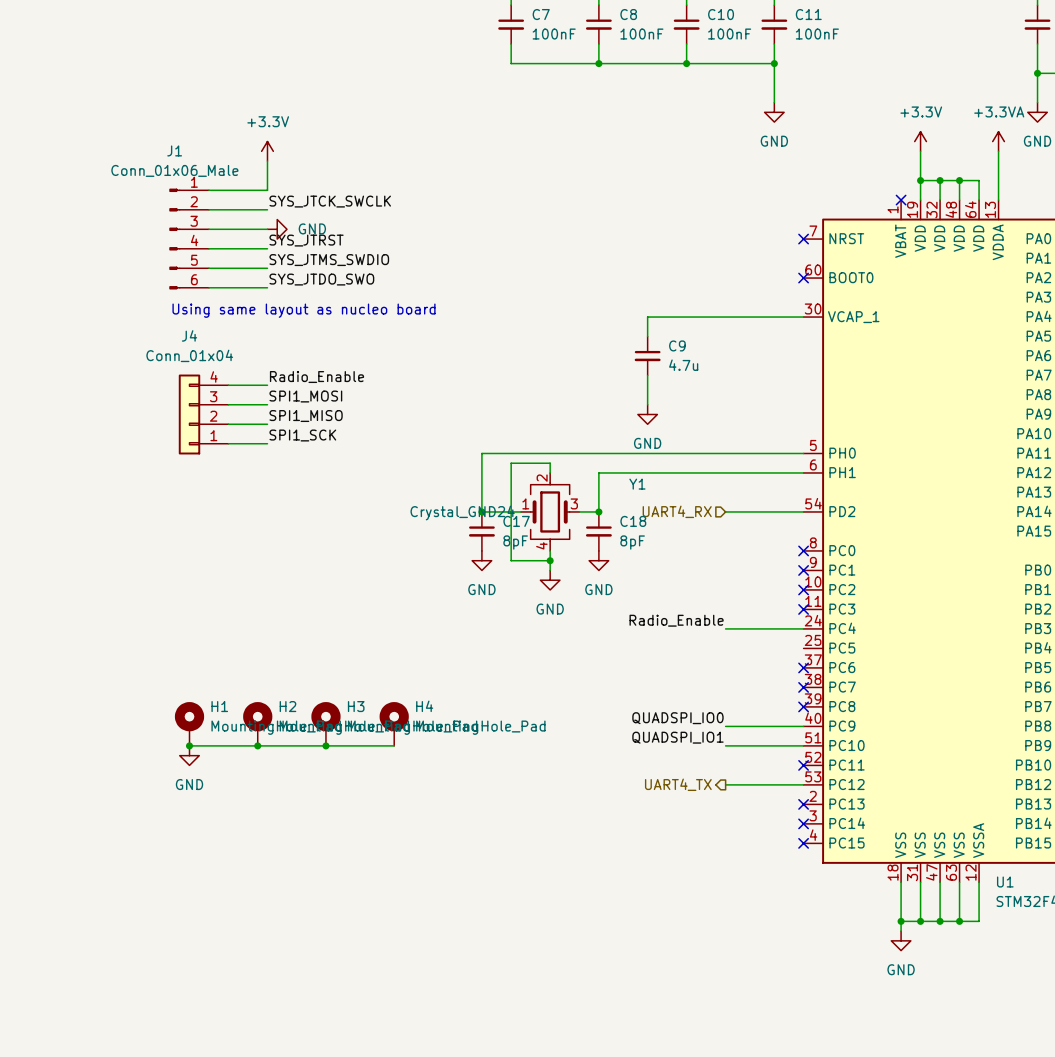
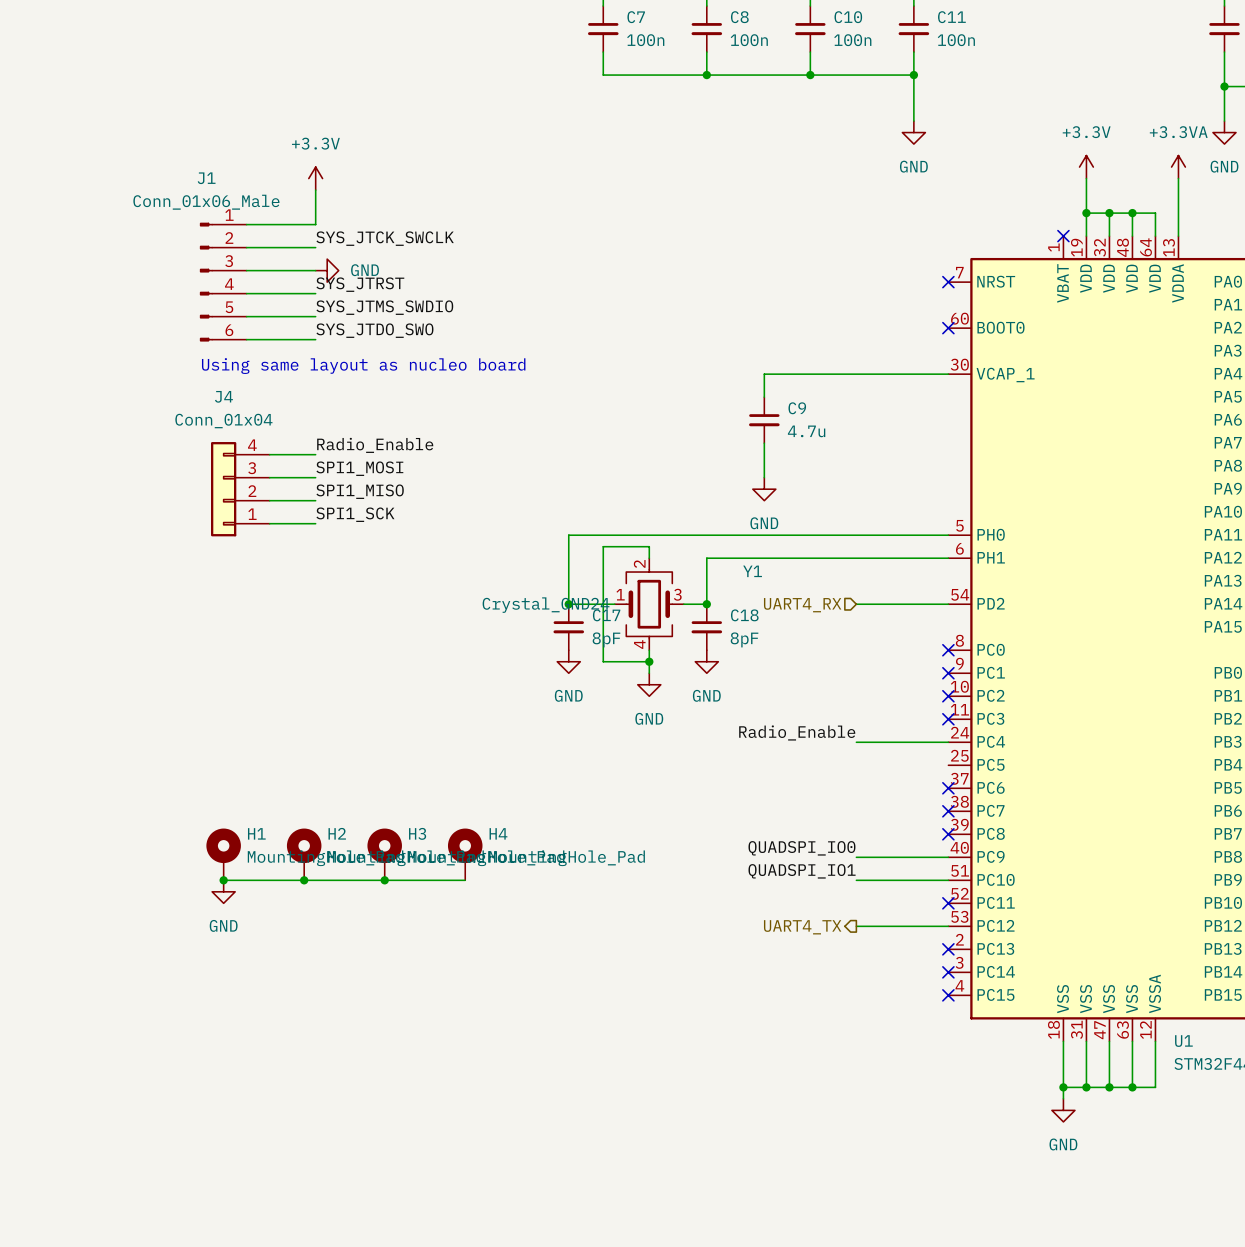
C7 value: 100nF (554, 34) -> 100n (645, 40)
C8 value: 100nF (641, 34) -> 100n (749, 40)
C10 value: 100nF (729, 34) -> 100n (852, 40)
C11 value: 100nF (817, 34) -> 100n (956, 40)

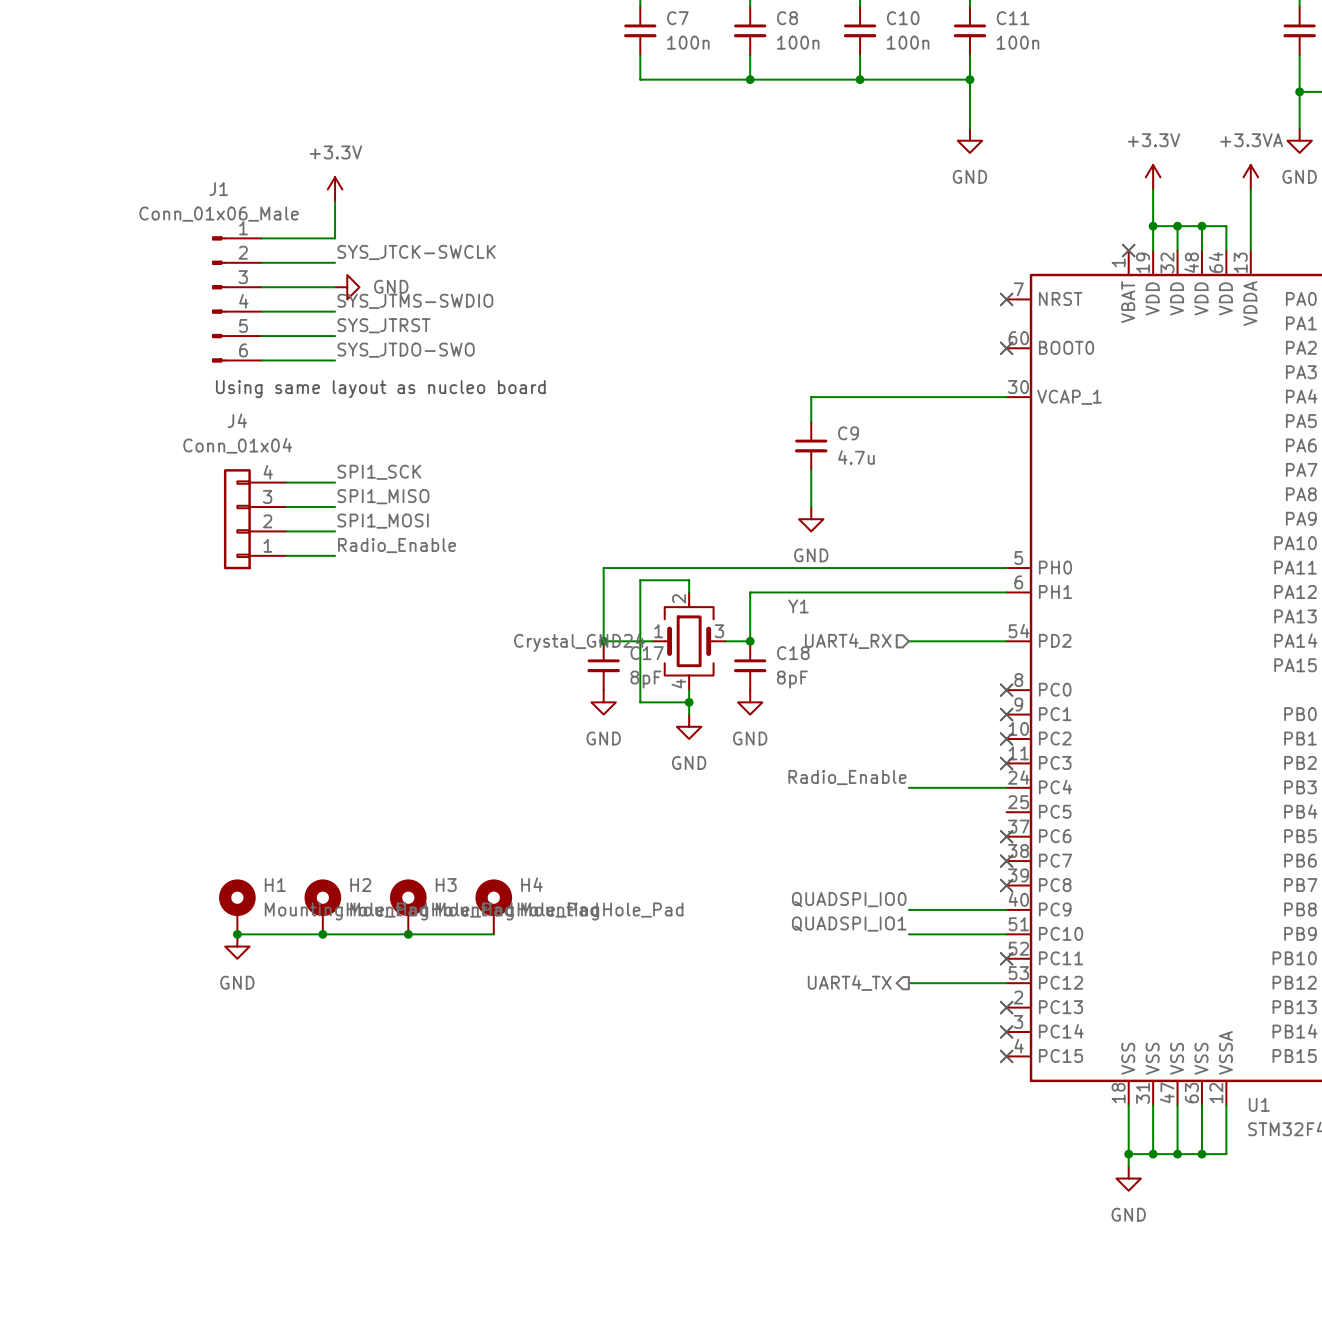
label: SYS_JTCK_SWCLK (385, 238) -> SYS_JTCK-SWCLK (416, 252)
label: SYS_JTRST (360, 284) -> SYS_JTMS-SWDIO (415, 301)
label: SYS_JTMS_SWDIO (384, 307) -> SYS_JTRST (383, 325)
label: SYS_JTDO_SWO (374, 330) -> SYS_JTDO-SWO (406, 350)
label: Radio_Enable (375, 445) -> SPI1_SCK (379, 472)
label: SPI1_MOSI (359, 468) -> SPI1_MISO (383, 496)
label: SPI1_MISO (360, 491) -> SPI1_MOSI (383, 521)
label: SPI1_SCK (355, 514) -> Radio_Enable (397, 545)

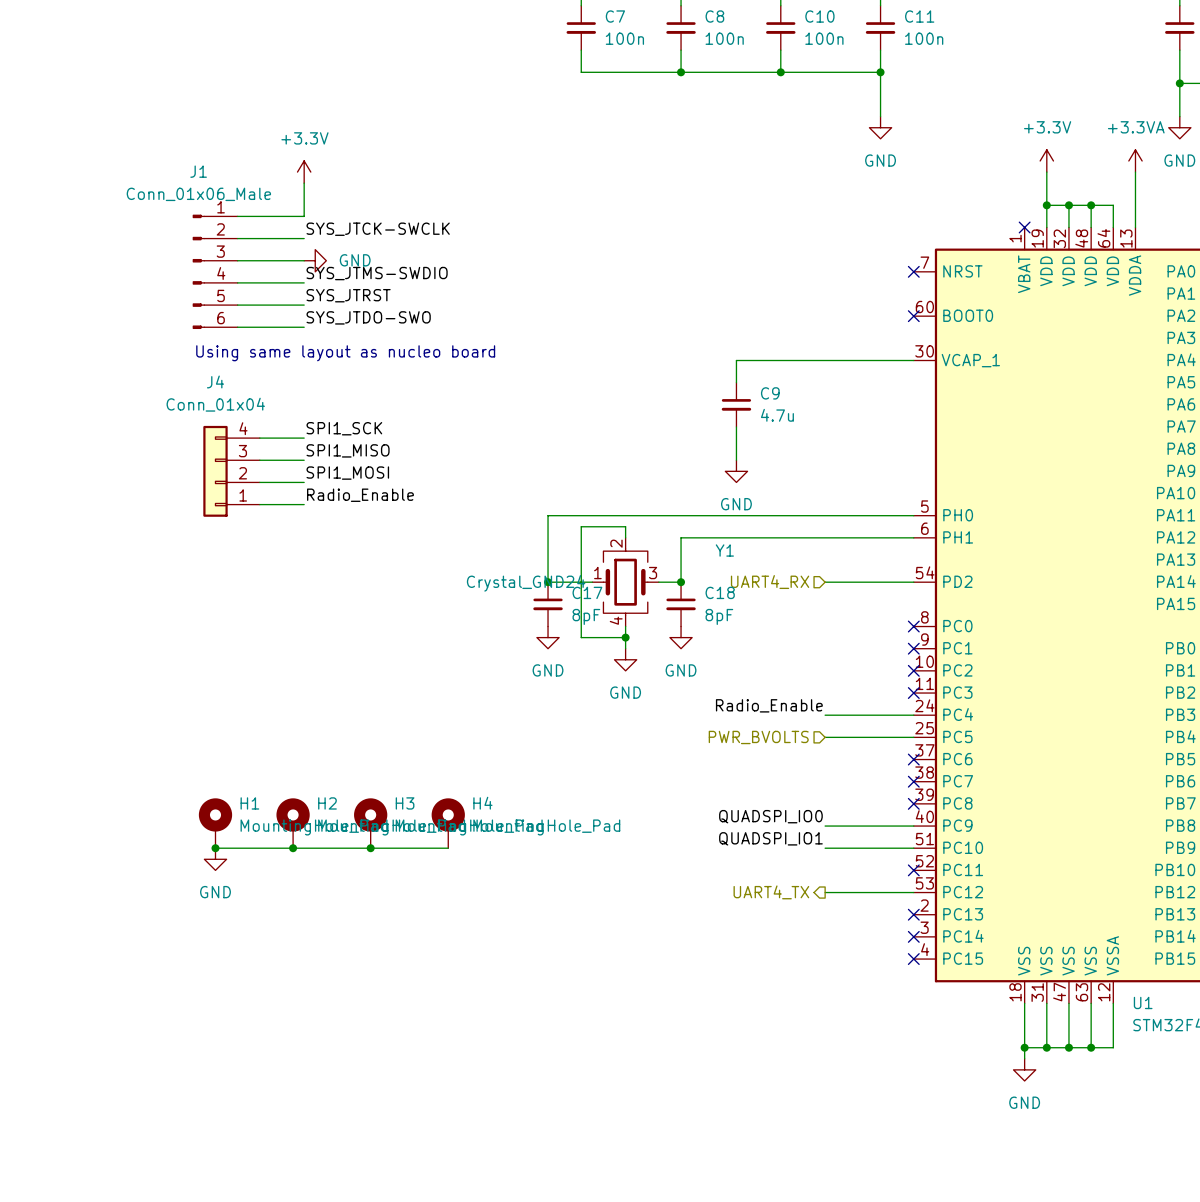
hierarchical label: none -> PWR_BVOLTS (758, 737)
wire: none -> (825, 737) (913, 737)

